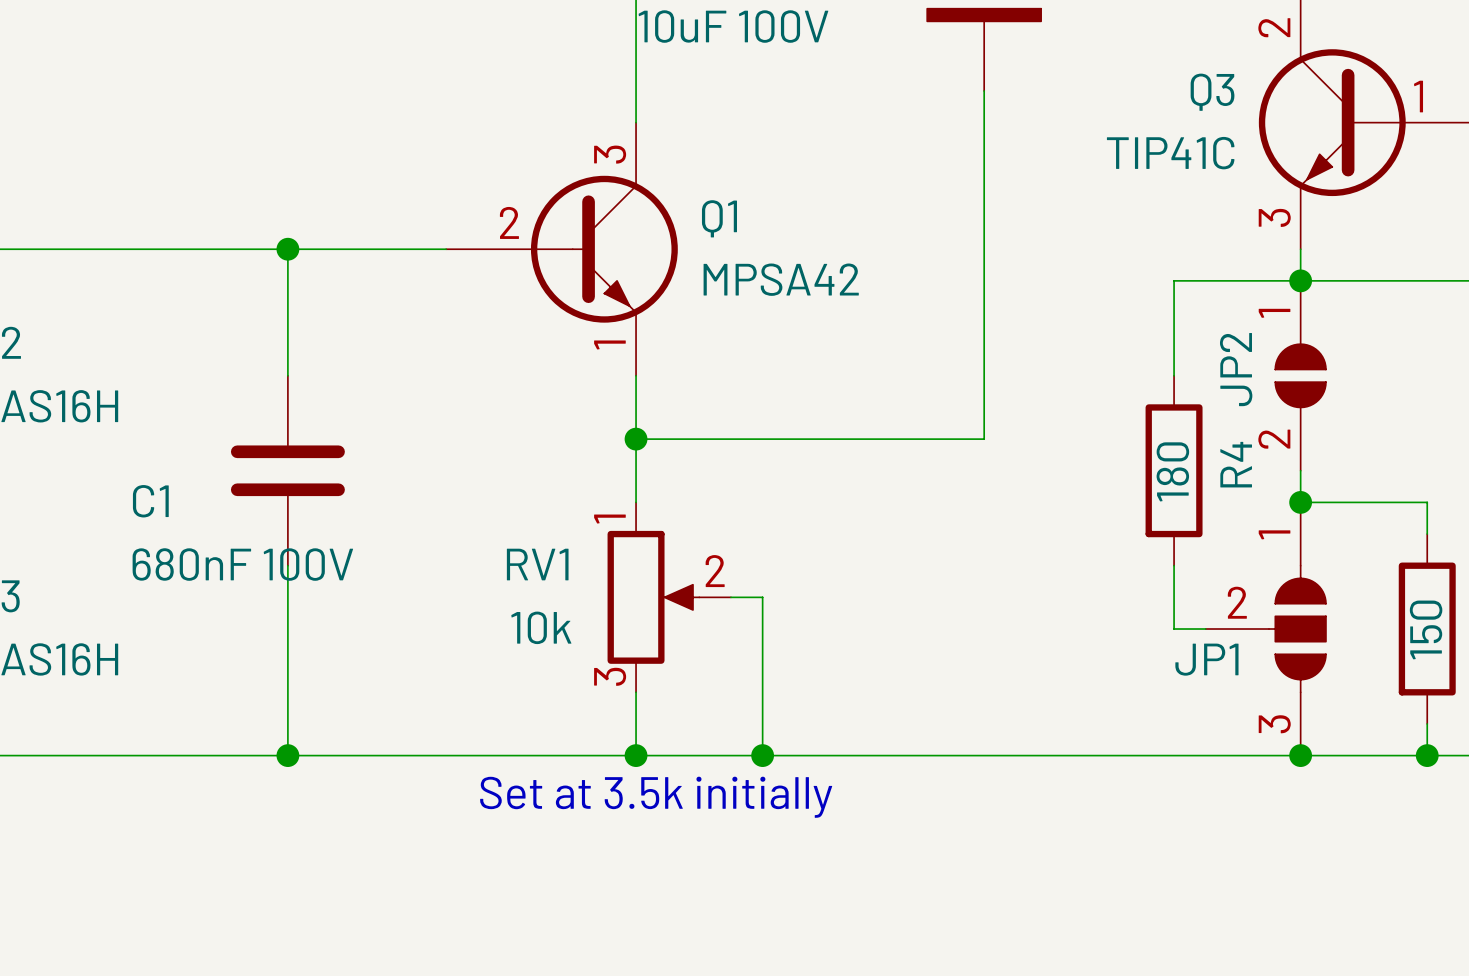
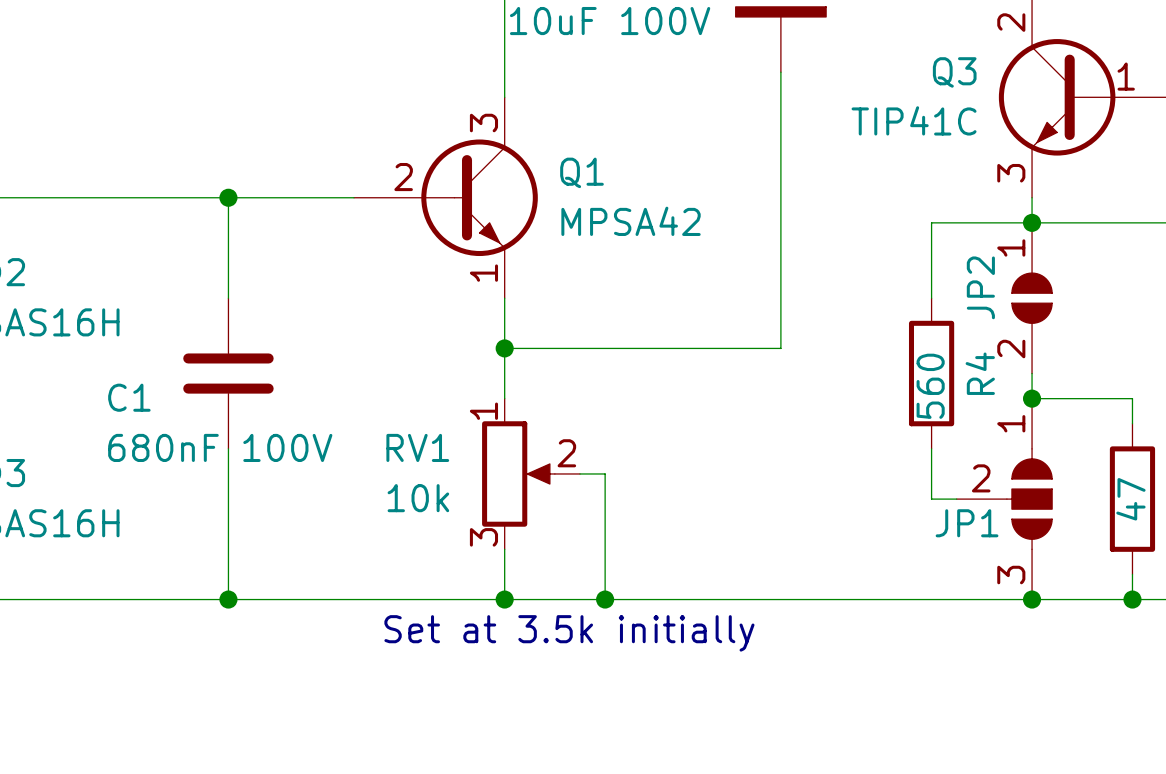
R4 value: 180 (1172, 471) -> 560 (930, 386)
part value: 150 (1426, 629) -> 47 (1130, 499)

